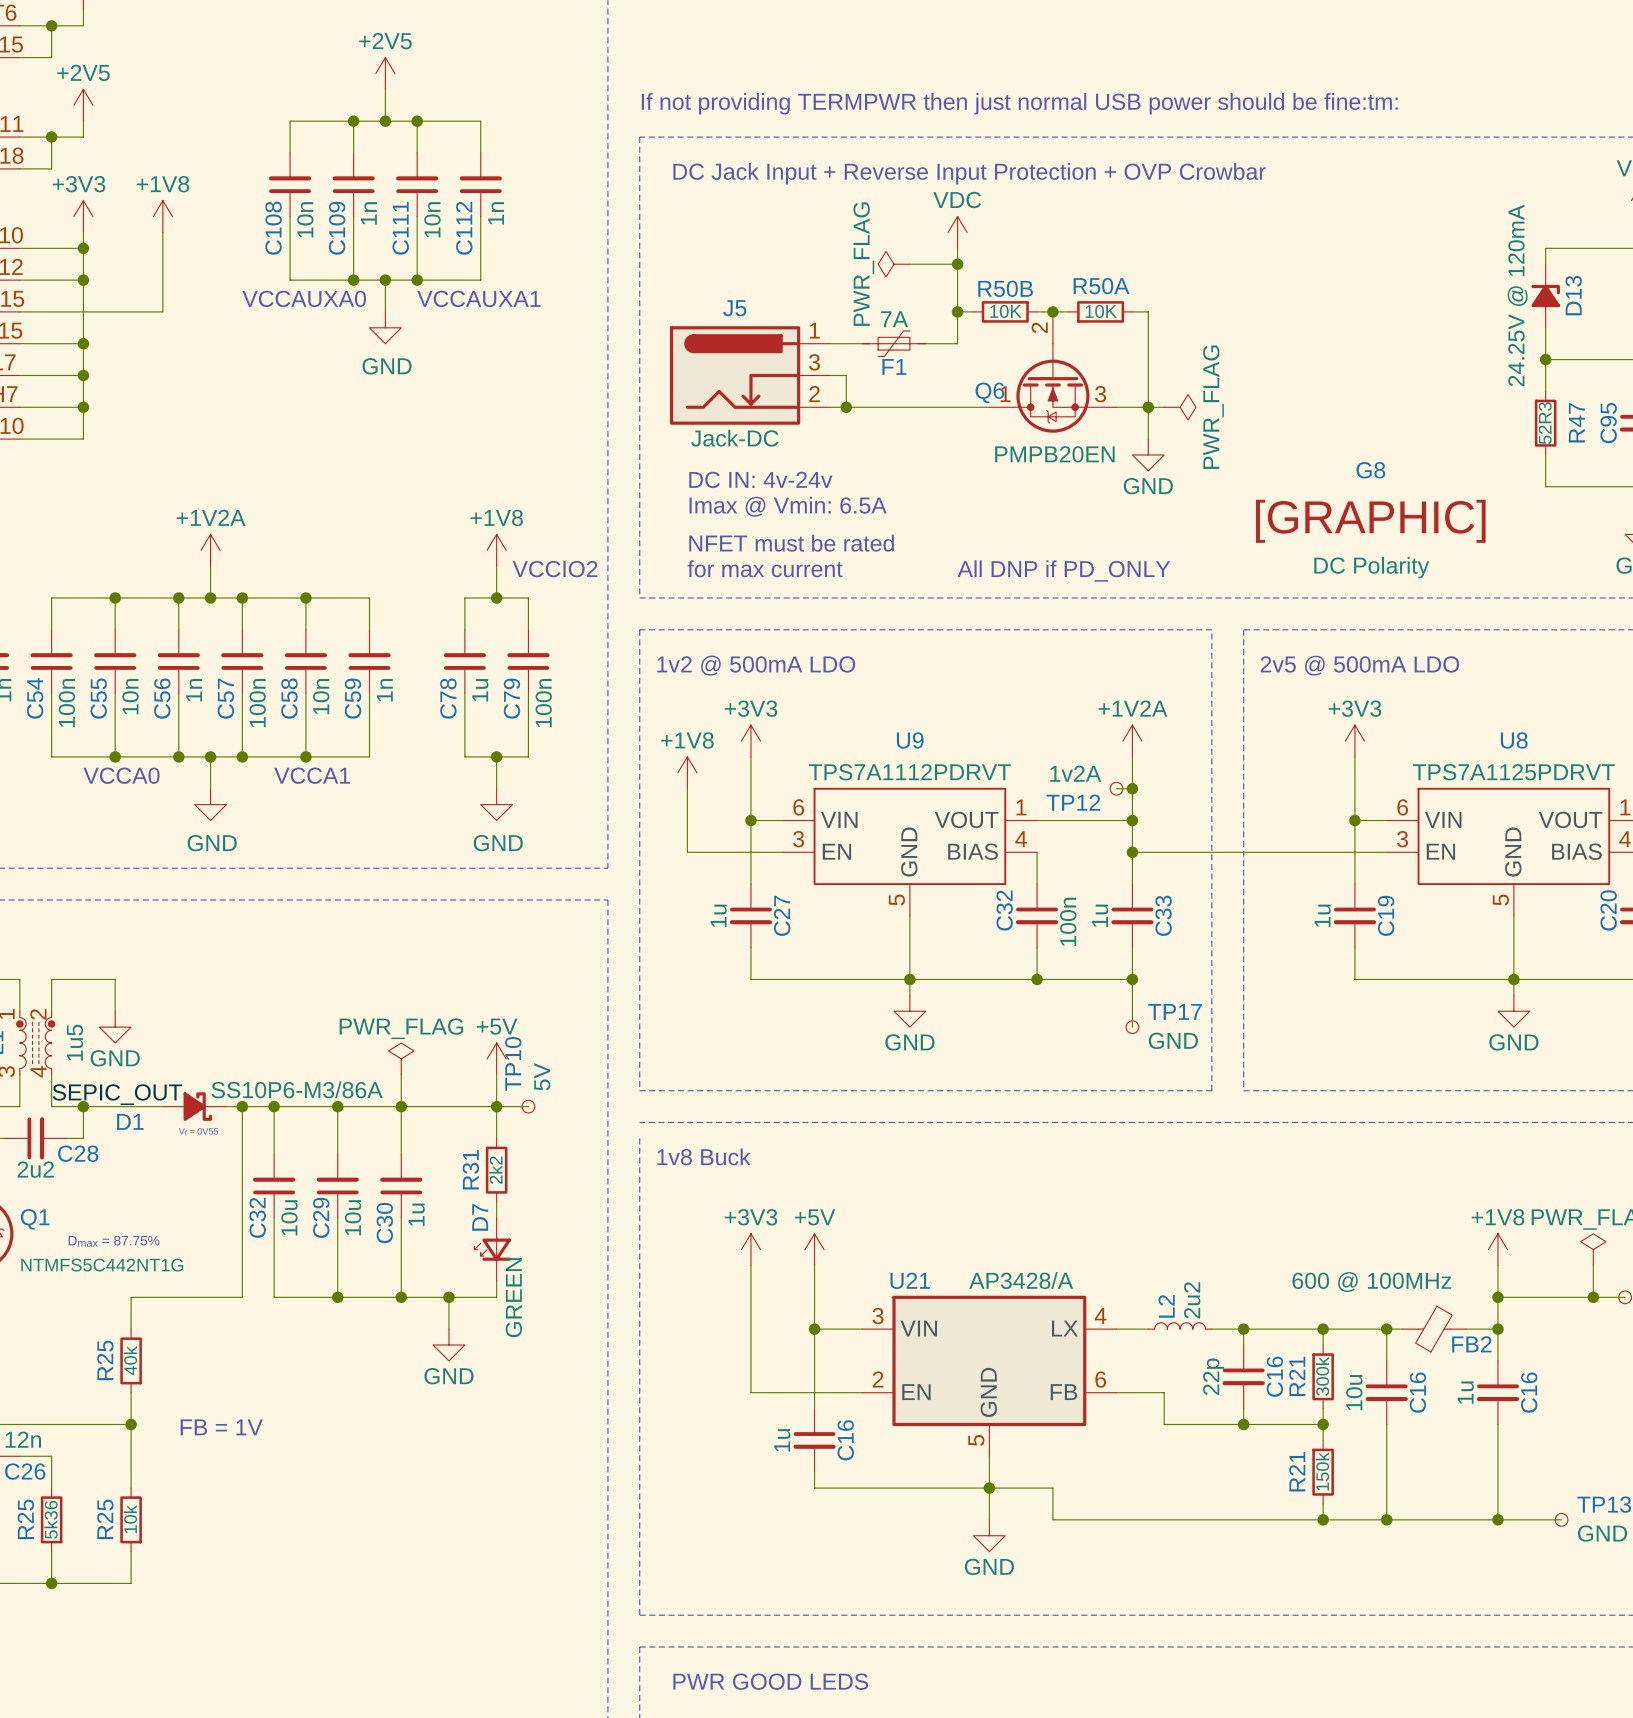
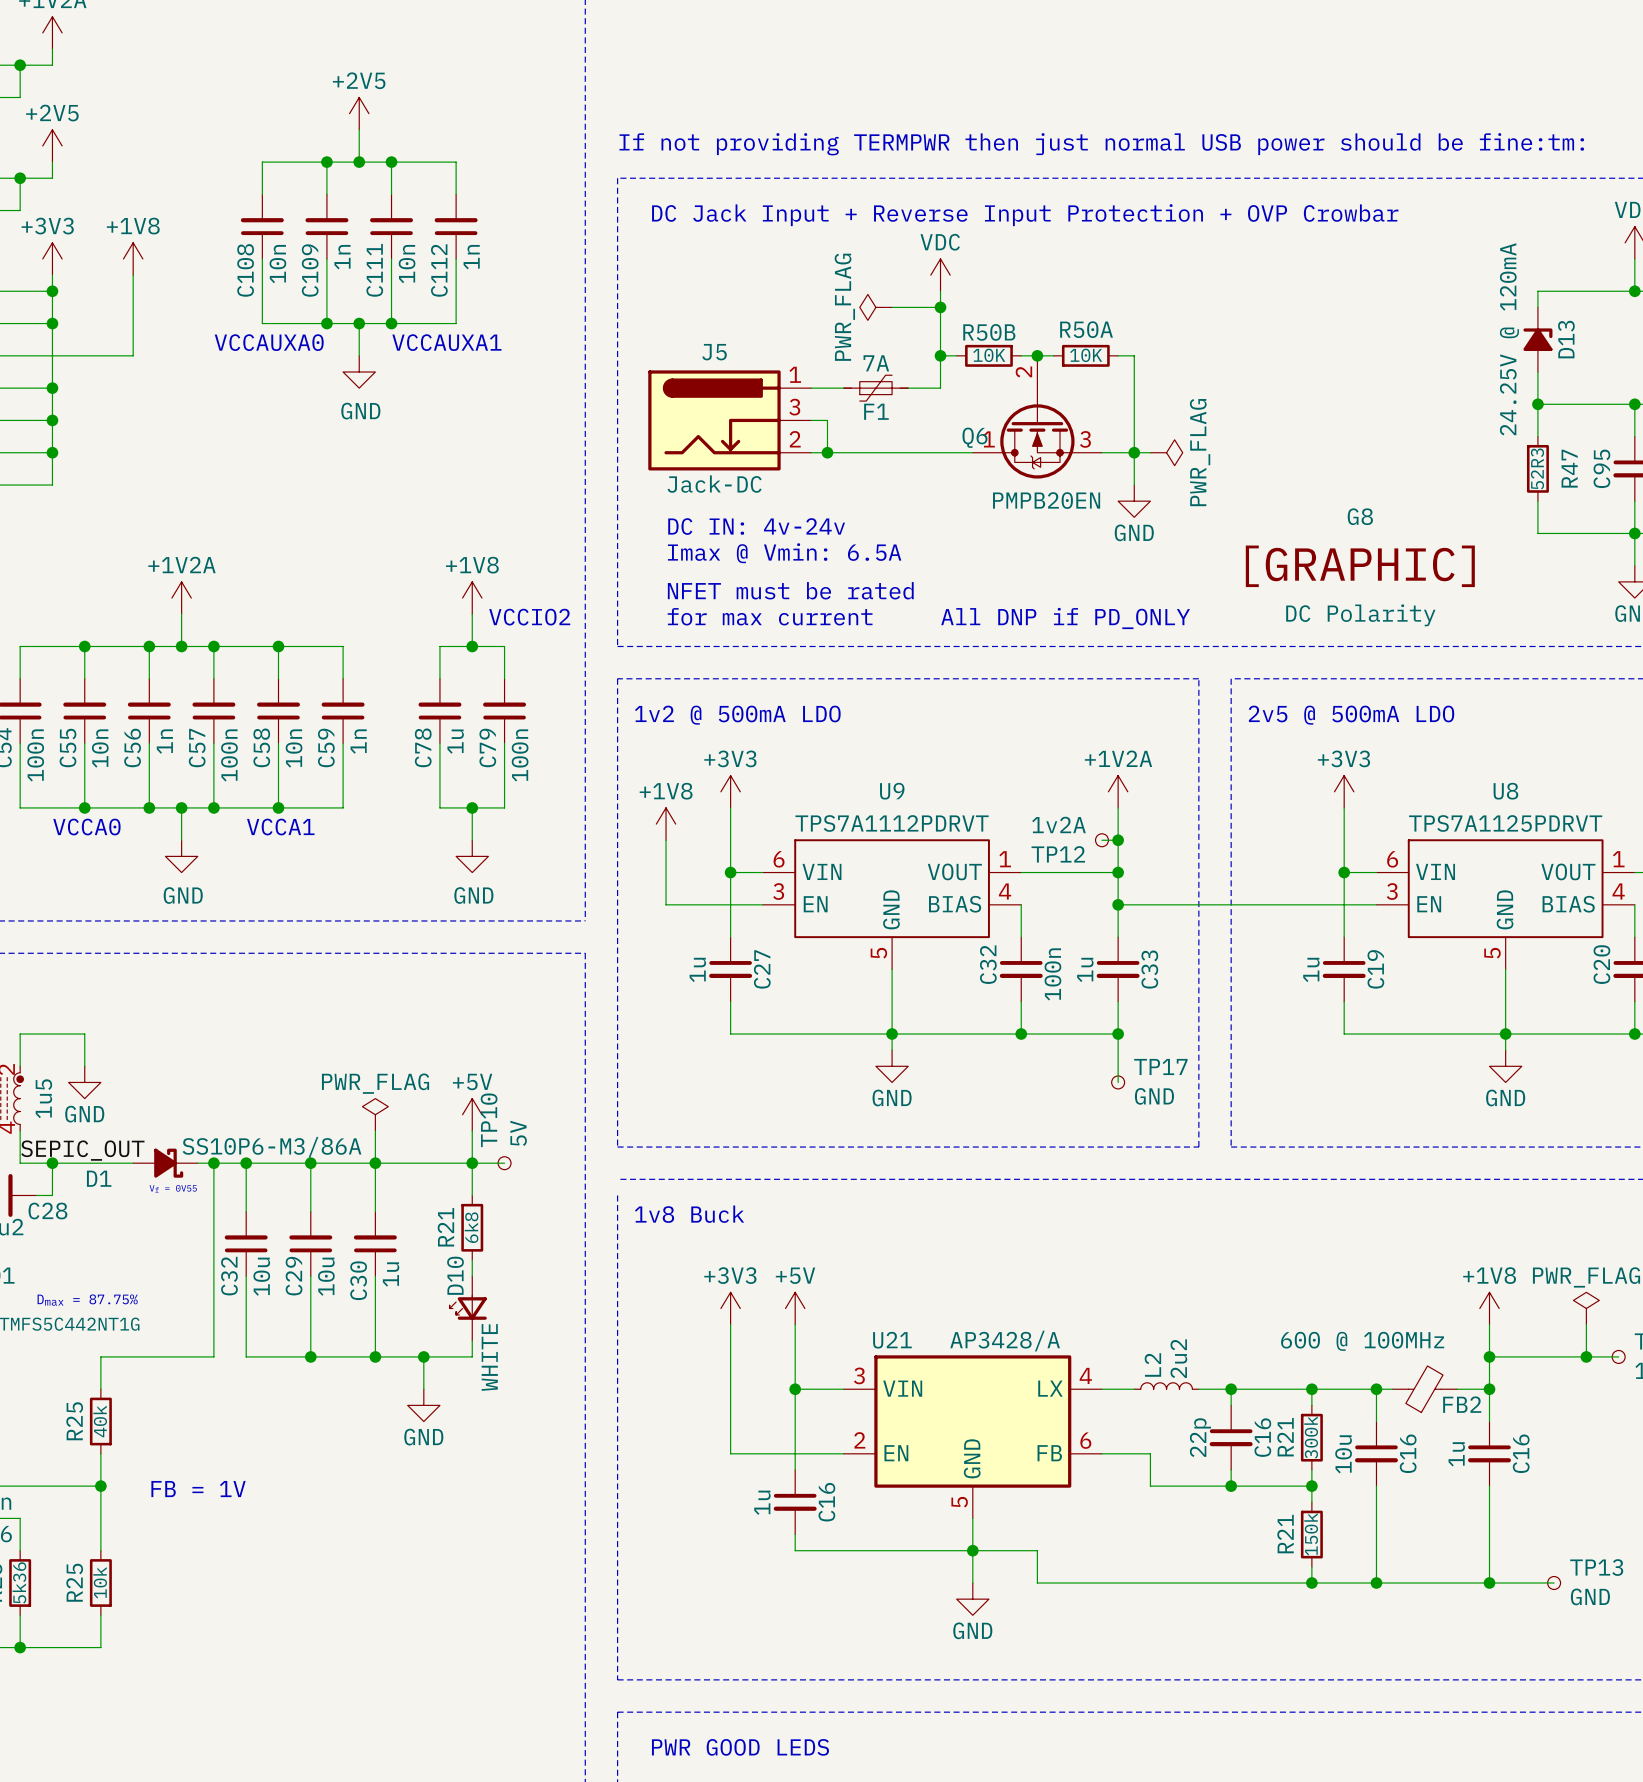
R31 name: R31 (470, 1169) -> R21 (445, 1227)
R31 value: 2k2 (495, 1170) -> 6k8 (471, 1227)
D7 name: D7 (480, 1217) -> D10 (455, 1275)
D7 value: GREEN (513, 1297) -> WHITE (489, 1357)

